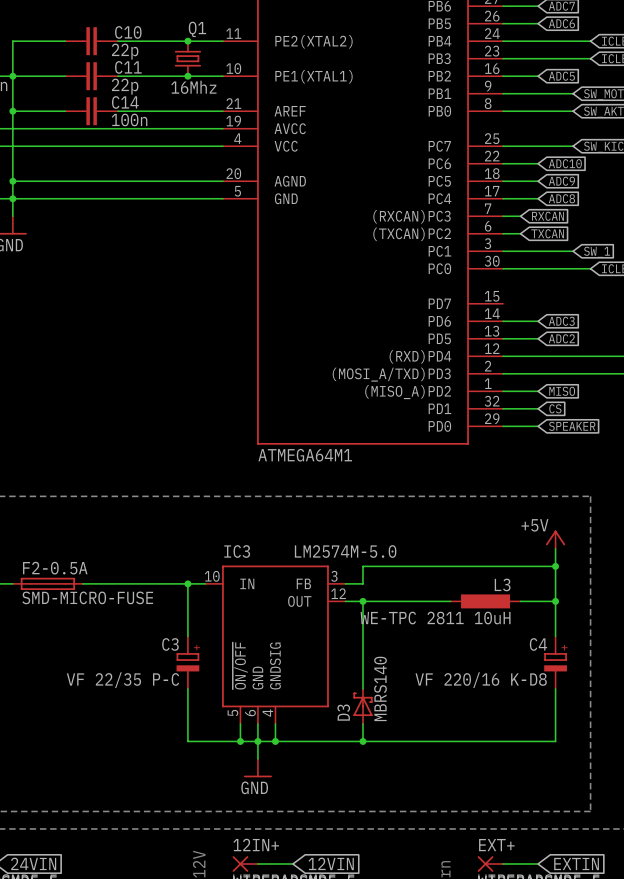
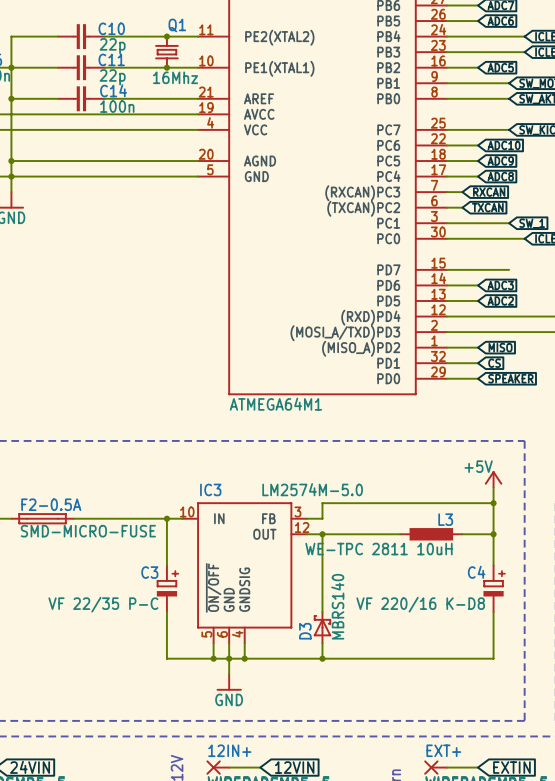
wire: none -> (446, 269) (509, 269)

